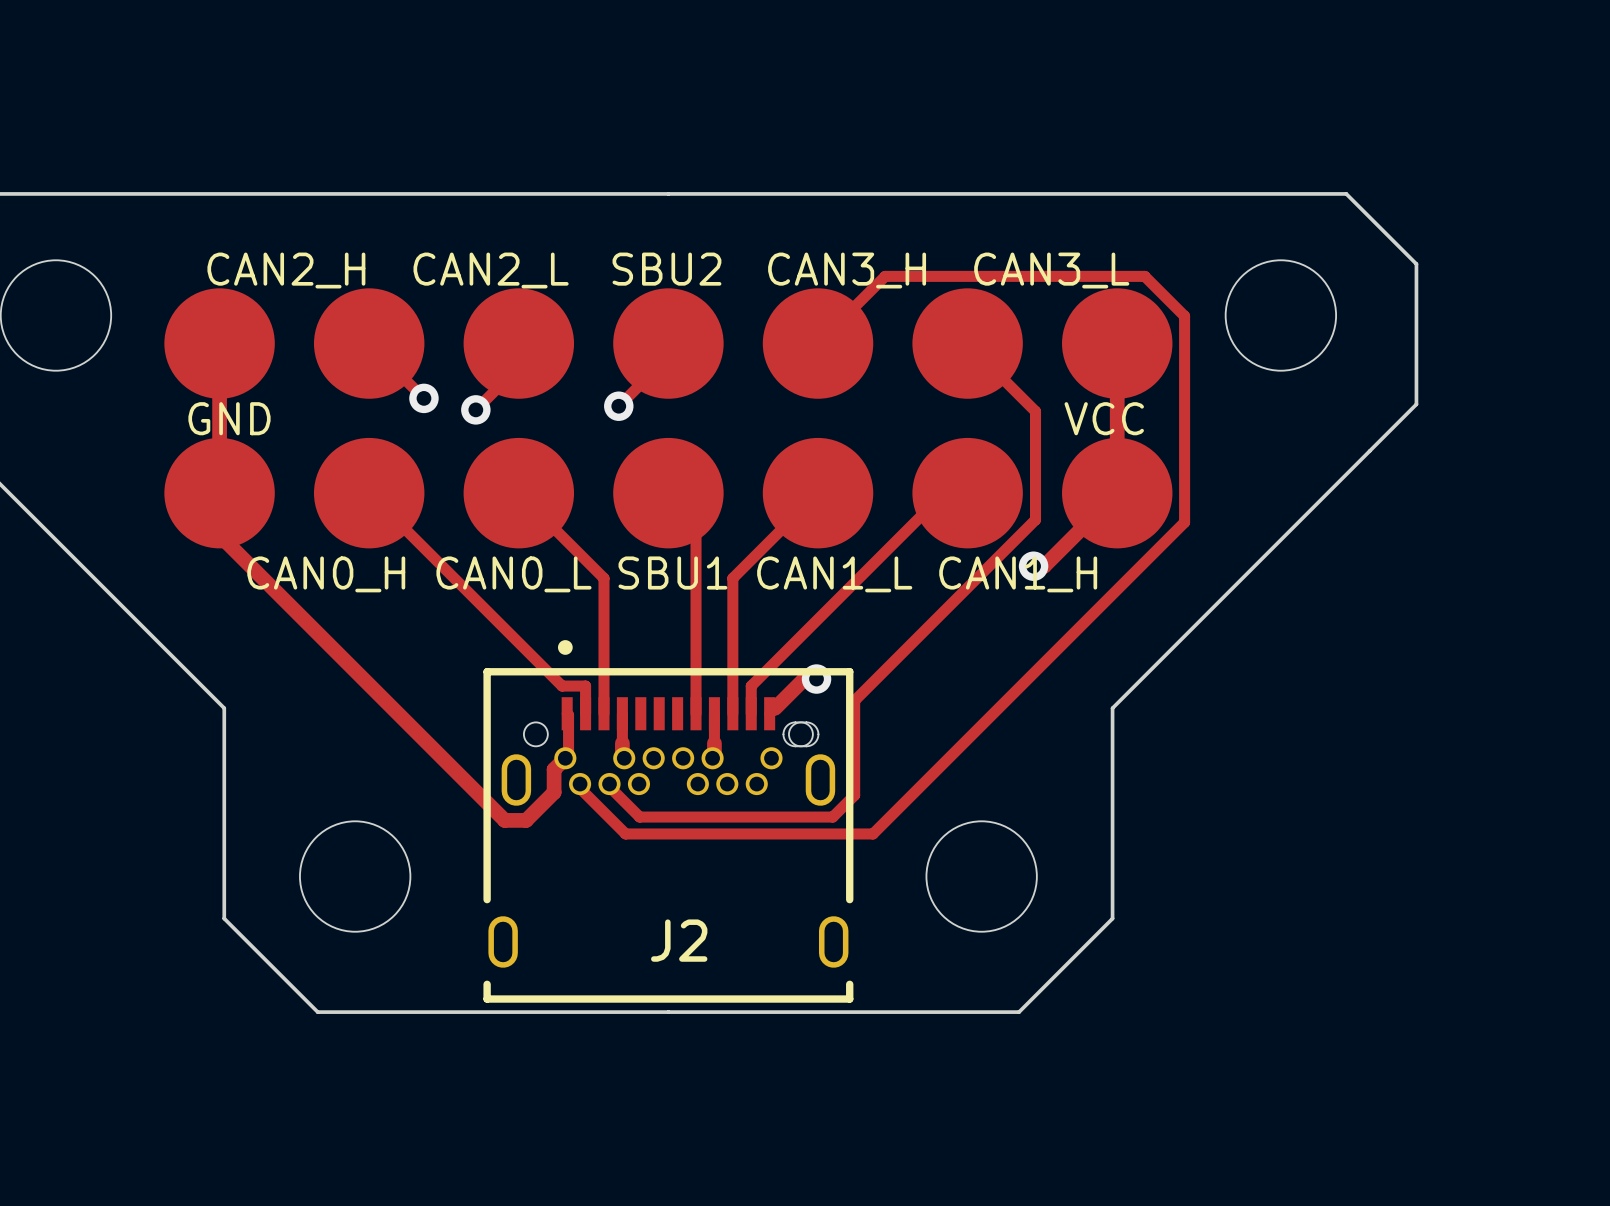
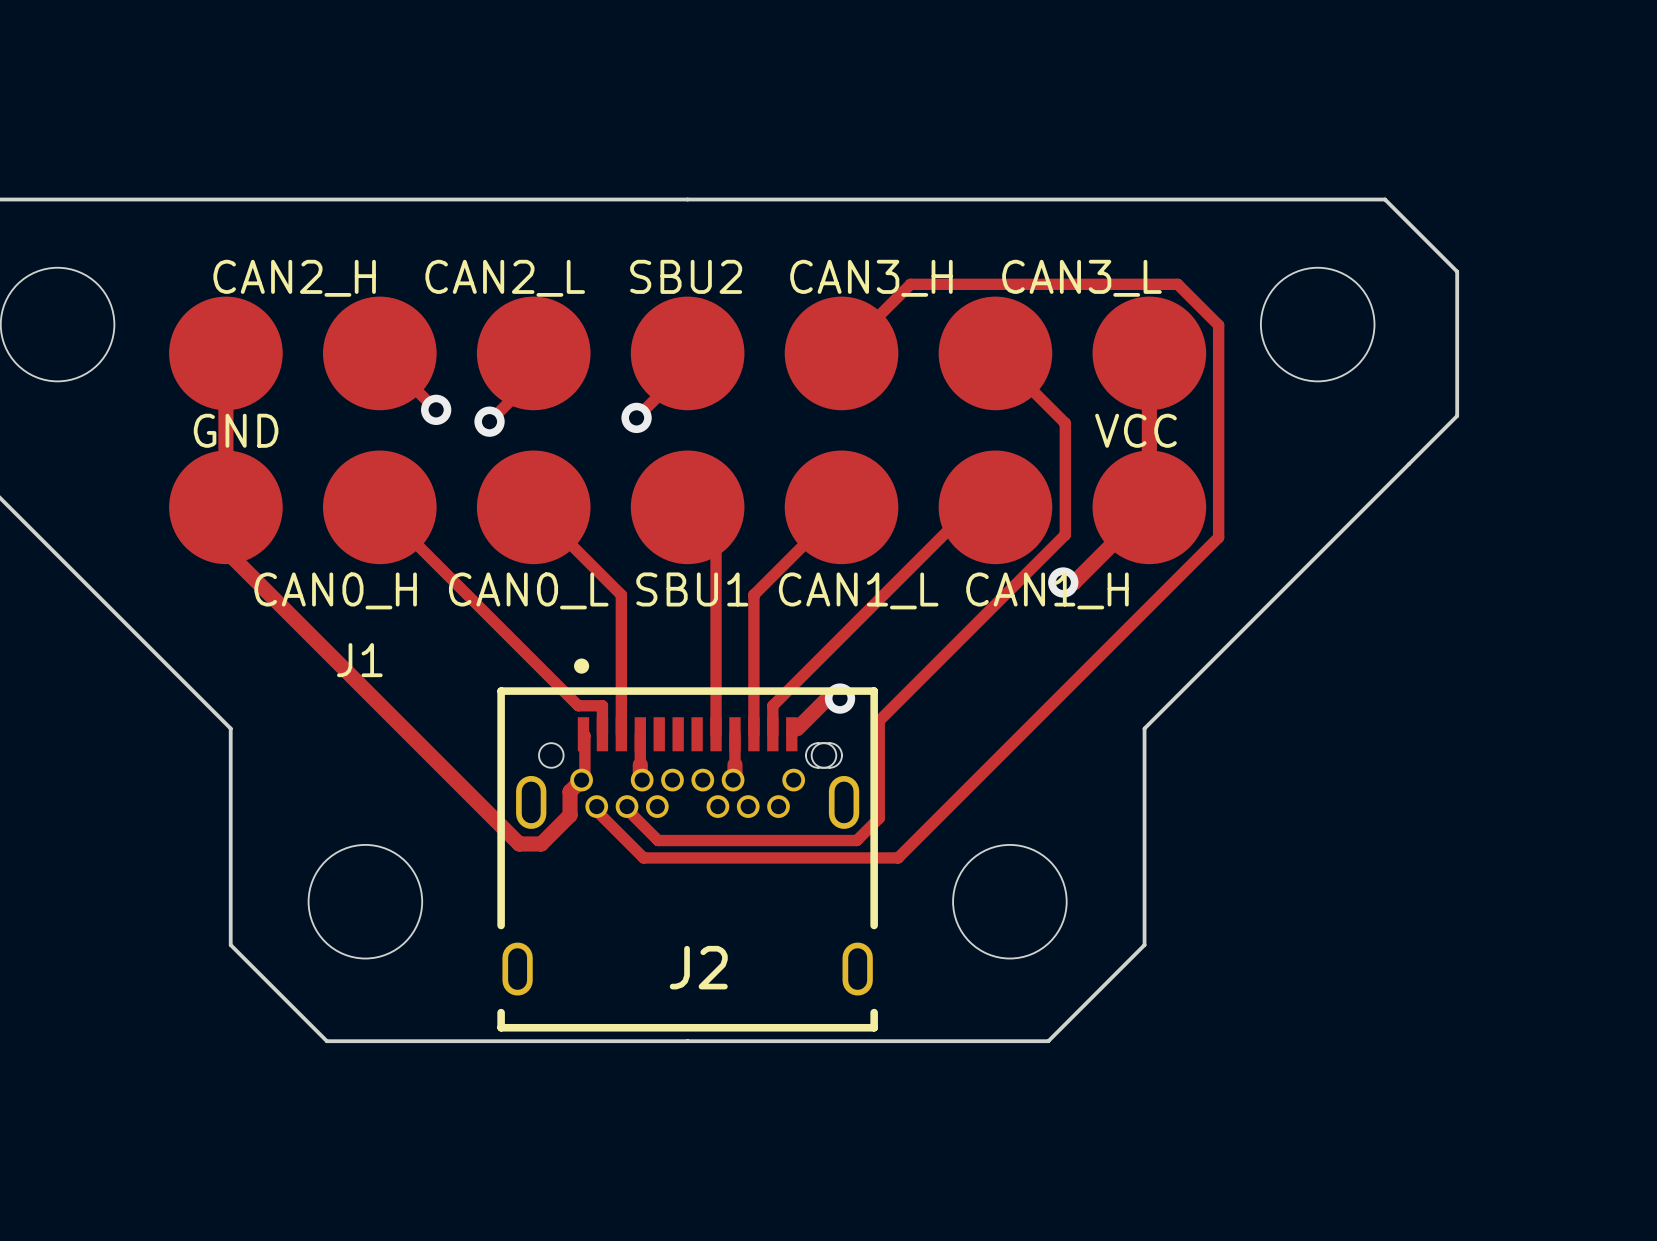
J1 name: none -> J1 (359, 660)

